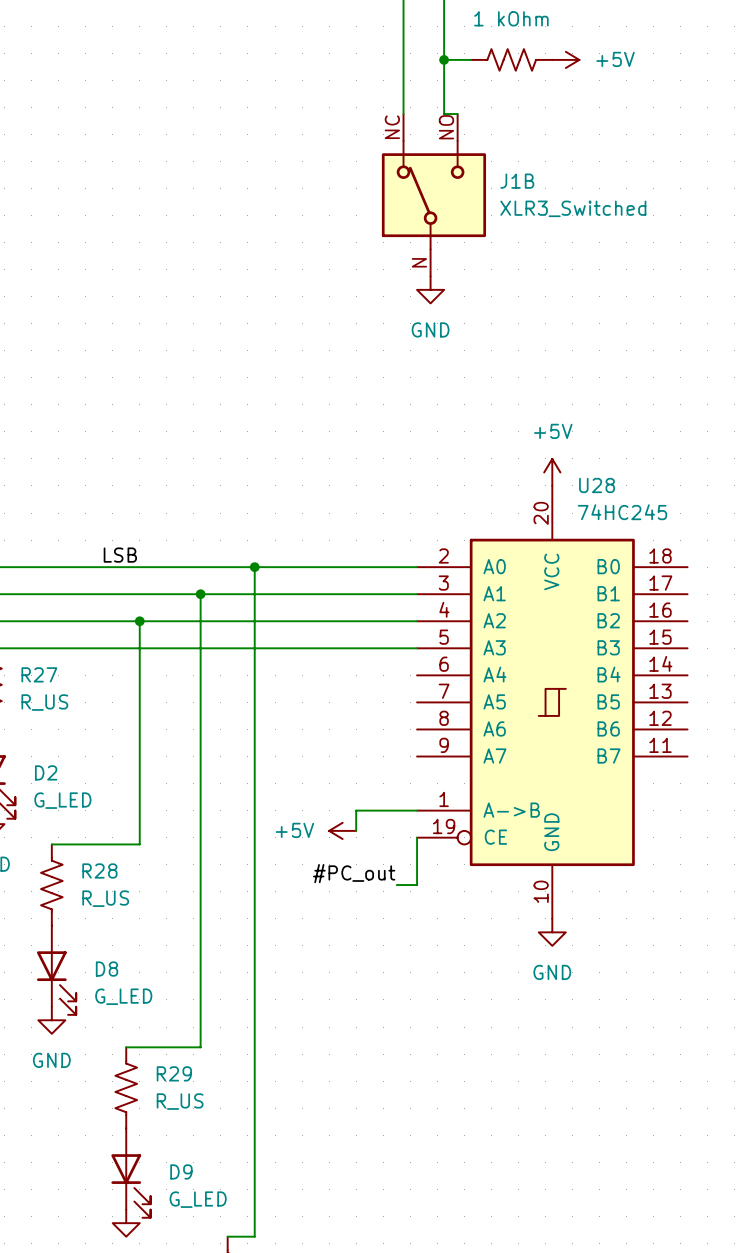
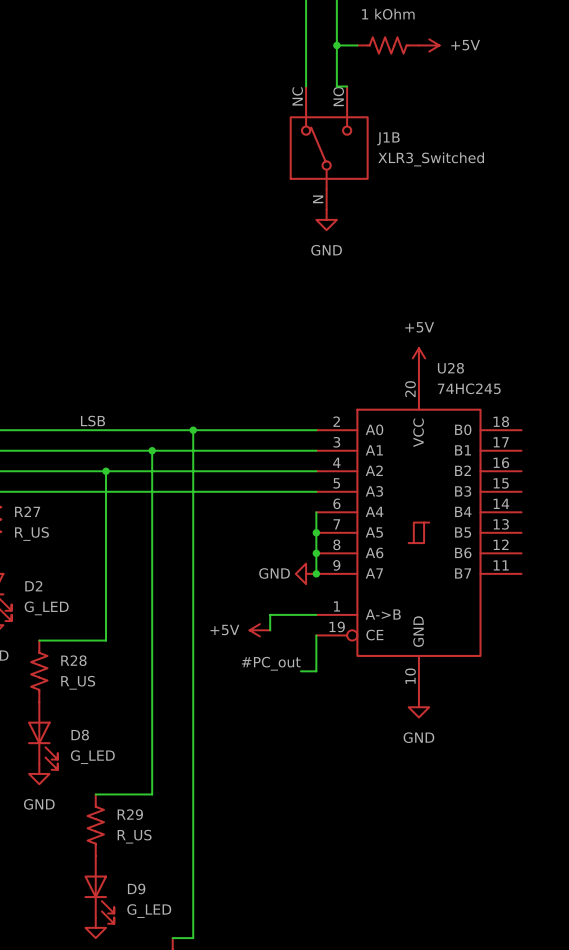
wire: none -> (316, 512) (316, 573)
junction: none -> (316, 532)
junction: none -> (316, 553)
power symbol: none -> GND (306, 573)
junction: none -> (316, 573)

